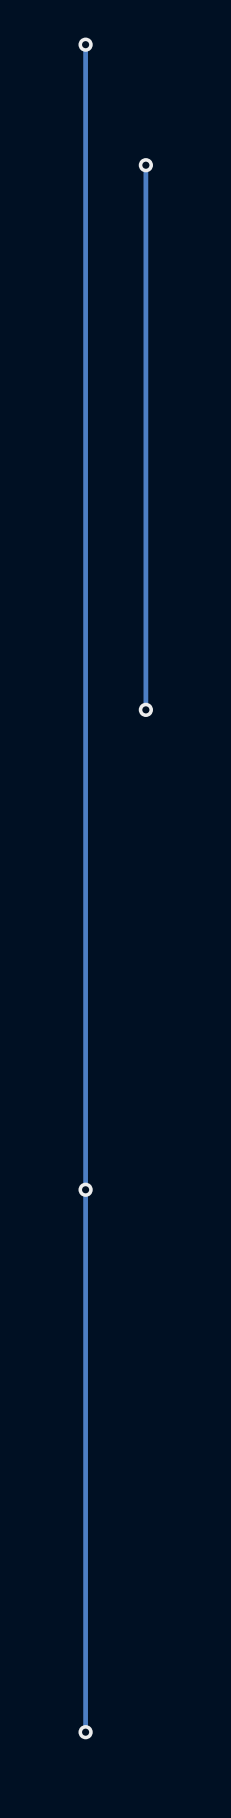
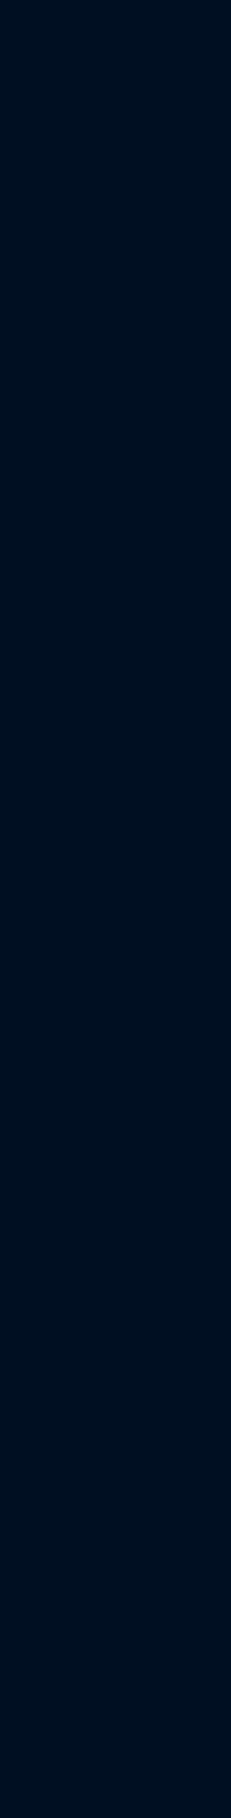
track: (85, 44) (85, 1732) -> none
via: (85, 44) -> none
track: (145, 165) (145, 709) -> none
via: (145, 165) -> none
via: (145, 709) -> none
via: (85, 1189) -> none
via: (85, 1732) -> none

